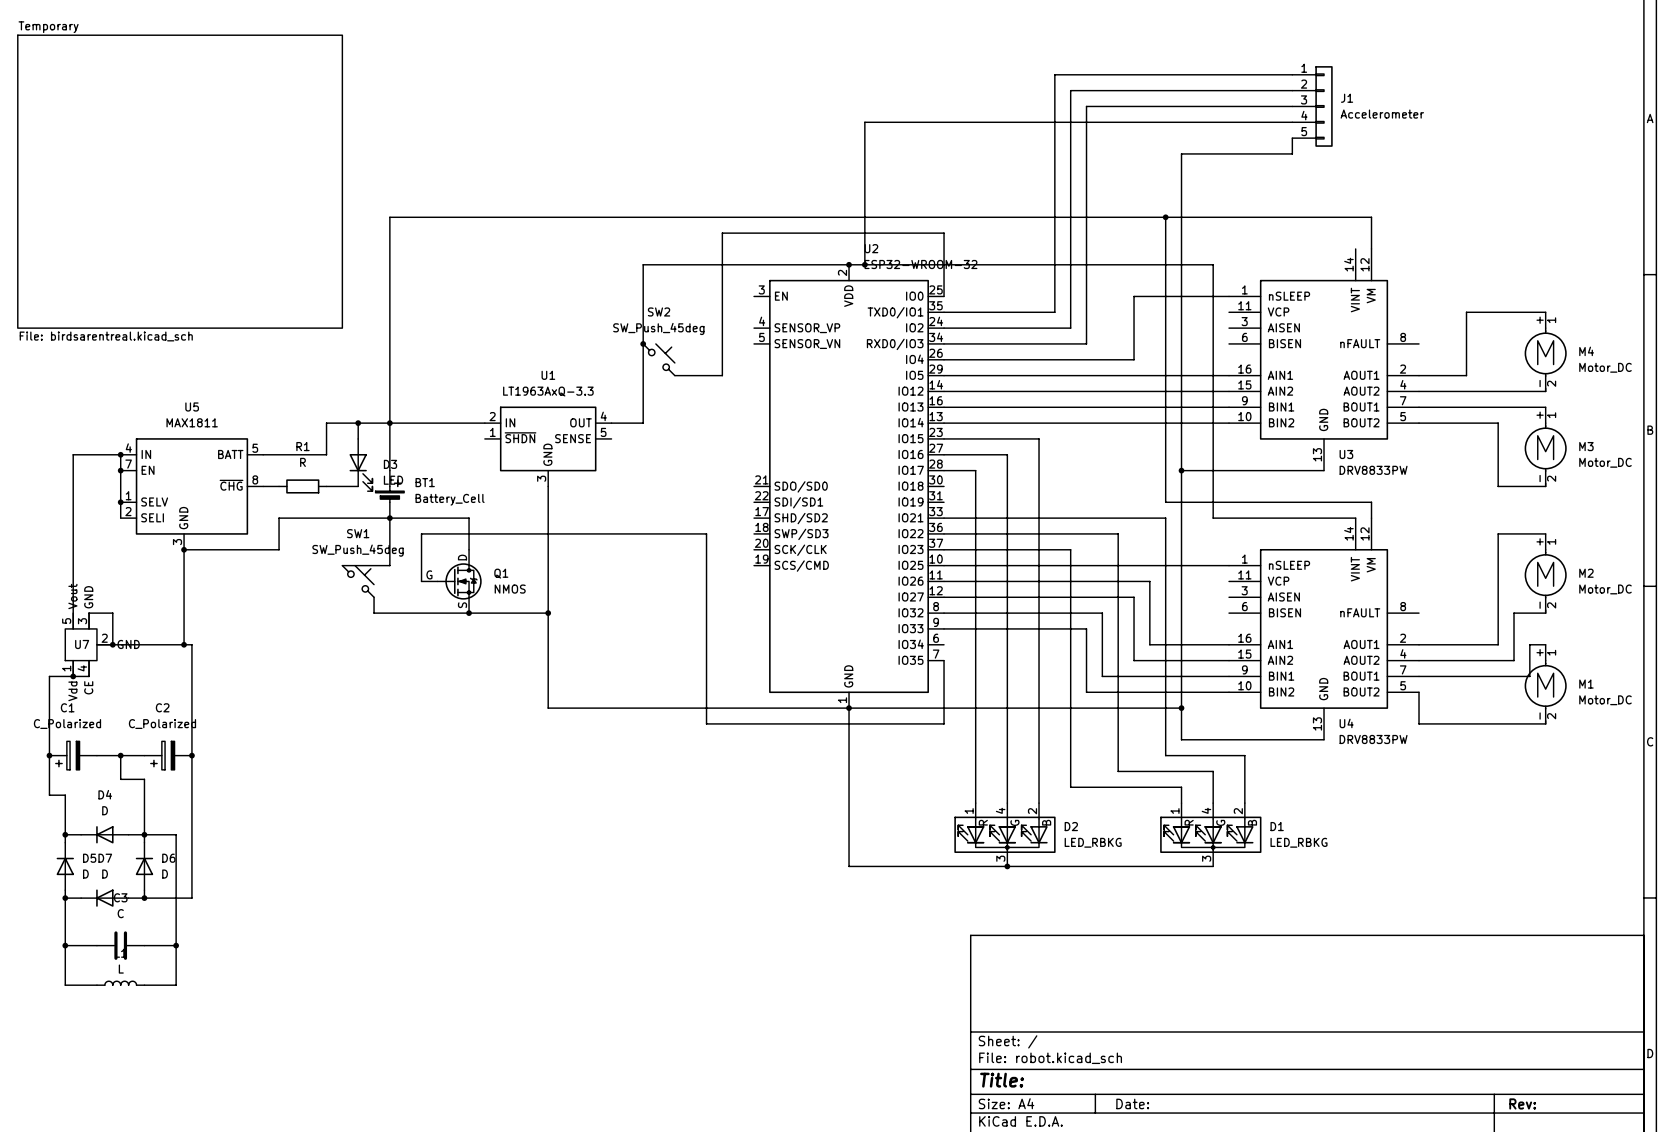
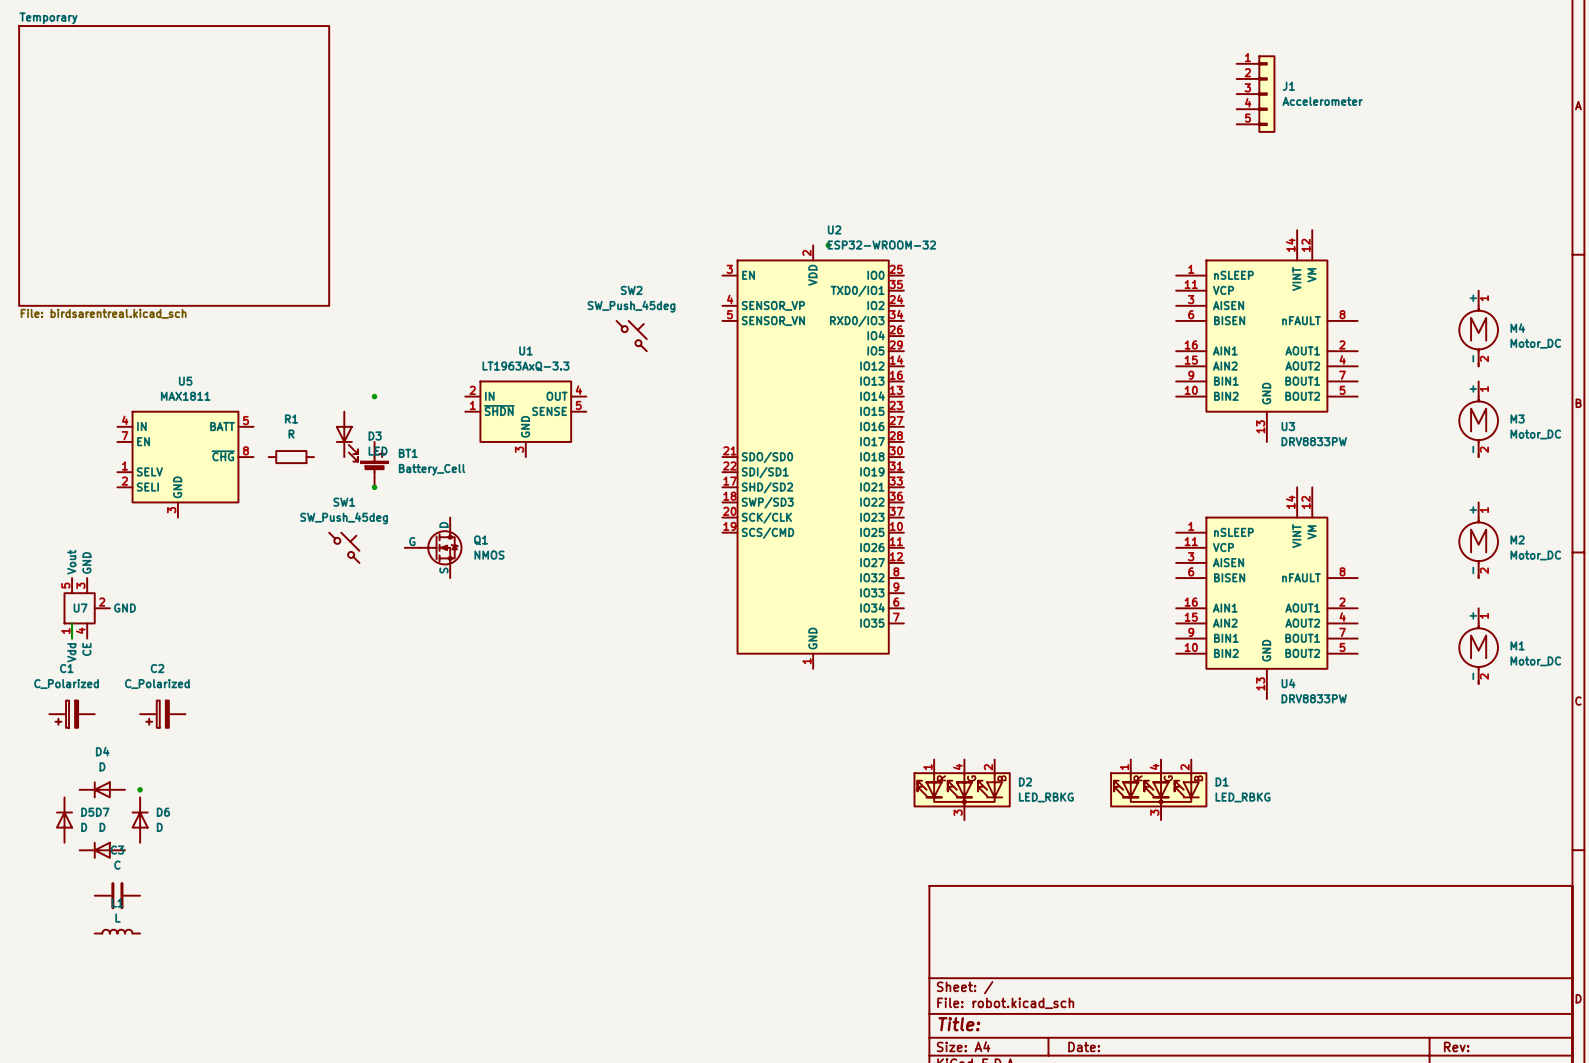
wire: (1292, 74) (1054, 74) (1054, 312) (944, 312) -> none
wire: (1292, 90) (1070, 90) (1070, 328) (944, 328) -> none
wire: (1292, 106) (1086, 106) (1086, 343) (944, 343) -> none
wire: (1292, 122) (864, 122) (864, 264) -> none
wire: (1292, 138) (1292, 153) (1181, 153) (1181, 739) (1324, 739) -> none
wire: (1165, 217) (1165, 502) (1371, 502) (1371, 518) -> none
junction: (1165, 217) -> none
wire: (1371, 248) (1371, 217) (389, 217) (389, 470) -> none
junction: (849, 264) -> none
wire: (944, 296) (944, 233) (722, 233) (722, 375) (674, 375) -> none
wire: (1229, 296) (1134, 296) (1134, 359) (944, 359) -> none
wire: (1545, 312) (1466, 312) (1466, 375) (1419, 375) -> none
junction: (643, 343) -> none
wire: (944, 375) (1229, 375) -> none
wire: (944, 391) (1229, 391) -> none
wire: (1419, 391) (1545, 391) -> none
wire: (944, 407) (1229, 407) -> none
wire: (1419, 407) (1545, 407) -> none
wire: (358, 423) (358, 438) -> none
junction: (358, 423) -> none
wire: (484, 423) (326, 423) (326, 454) (263, 454) -> none
wire: (611, 423) (643, 423) (643, 264) (1213, 264) (1213, 518) (1355, 518) -> none
wire: (944, 423) (1229, 423) -> none
wire: (1419, 423) (1498, 423) (1498, 486) (1545, 486) -> none
wire: (944, 438) (1039, 438) (1039, 803) -> none
junction: (120, 454) -> none
wire: (944, 454) (1007, 454) (1007, 803) -> none
junction: (120, 470) -> none
wire: (944, 470) (975, 470) (975, 803) -> none
wire: (1181, 470) (1324, 470) -> none
junction: (1181, 470) -> none
wire: (263, 486) (279, 486) -> none
wire: (326, 486) (358, 486) -> none
wire: (548, 486) (548, 708) (1181, 708) -> none
junction: (120, 502) -> none
wire: (120, 518) (120, 454) (73, 454) (73, 628) -> none
wire: (389, 518) (389, 565) (342, 565) -> none
wire: (944, 518) (1165, 518) (1165, 755) (1244, 755) (1244, 803) -> none
wire: (944, 533) (1118, 533) (1118, 771) (1213, 771) (1213, 803) -> none
wire: (1545, 533) (1498, 533) (1498, 644) (1419, 644) -> none
junction: (184, 549) -> none
wire: (469, 549) (469, 518) (279, 518) (279, 549) (184, 549) (184, 644) -> none
wire: (944, 549) (1070, 549) (1070, 787) (1181, 787) (1181, 803) -> none
wire: (944, 565) (1229, 565) -> none
wire: (421, 581) (421, 533) (706, 533) (706, 723) (944, 723) (944, 660) -> none
wire: (944, 581) (1149, 581) (1149, 644) (1229, 644) -> none
wire: (374, 597) (374, 613) (548, 613) -> none
wire: (944, 597) (1134, 597) (1134, 660) (1229, 660) -> none
junction: (469, 613) -> none
junction: (548, 613) -> none
wire: (944, 613) (1102, 613) (1102, 676) (1229, 676) -> none
wire: (1545, 613) (1514, 613) (1514, 660) (1419, 660) -> none
wire: (89, 628) (89, 613) (112, 613) (112, 644) -> none
wire: (944, 628) (1086, 628) (1086, 692) (1229, 692) -> none
wire: (96, 644) (191, 644) (191, 898) (128, 898) -> none
junction: (112, 644) -> none
junction: (184, 644) -> none
wire: (1545, 644) (1529, 644) (1529, 676) (1419, 676) -> none
wire: (89, 660) (89, 676) (49, 676) (49, 795) (65, 795) (65, 842) -> none
junction: (73, 676) -> none
wire: (1419, 692) (1419, 723) (1545, 723) -> none
wire: (849, 708) (849, 866) (1213, 866) -> none
junction: (849, 708) -> none
junction: (1181, 708) -> none
junction: (49, 755) -> none
wire: (96, 755) (144, 755) -> none
wire: (120, 755) (120, 779) (144, 779) (144, 842) -> none
junction: (120, 755) -> none
junction: (191, 755) -> none
wire: (65, 834) (81, 834) -> none
junction: (65, 834) -> none
wire: (128, 834) (176, 834) (176, 985) (144, 985) -> none
junction: (1007, 866) -> none
wire: (65, 890) (65, 985) (96, 985) -> none
wire: (144, 890) (144, 898) -> none
wire: (65, 898) (81, 898) -> none
junction: (65, 898) -> none
junction: (144, 898) -> none
wire: (65, 945) (96, 945) -> none
junction: (65, 945) -> none
wire: (144, 945) (176, 945) -> none
junction: (176, 945) -> none

